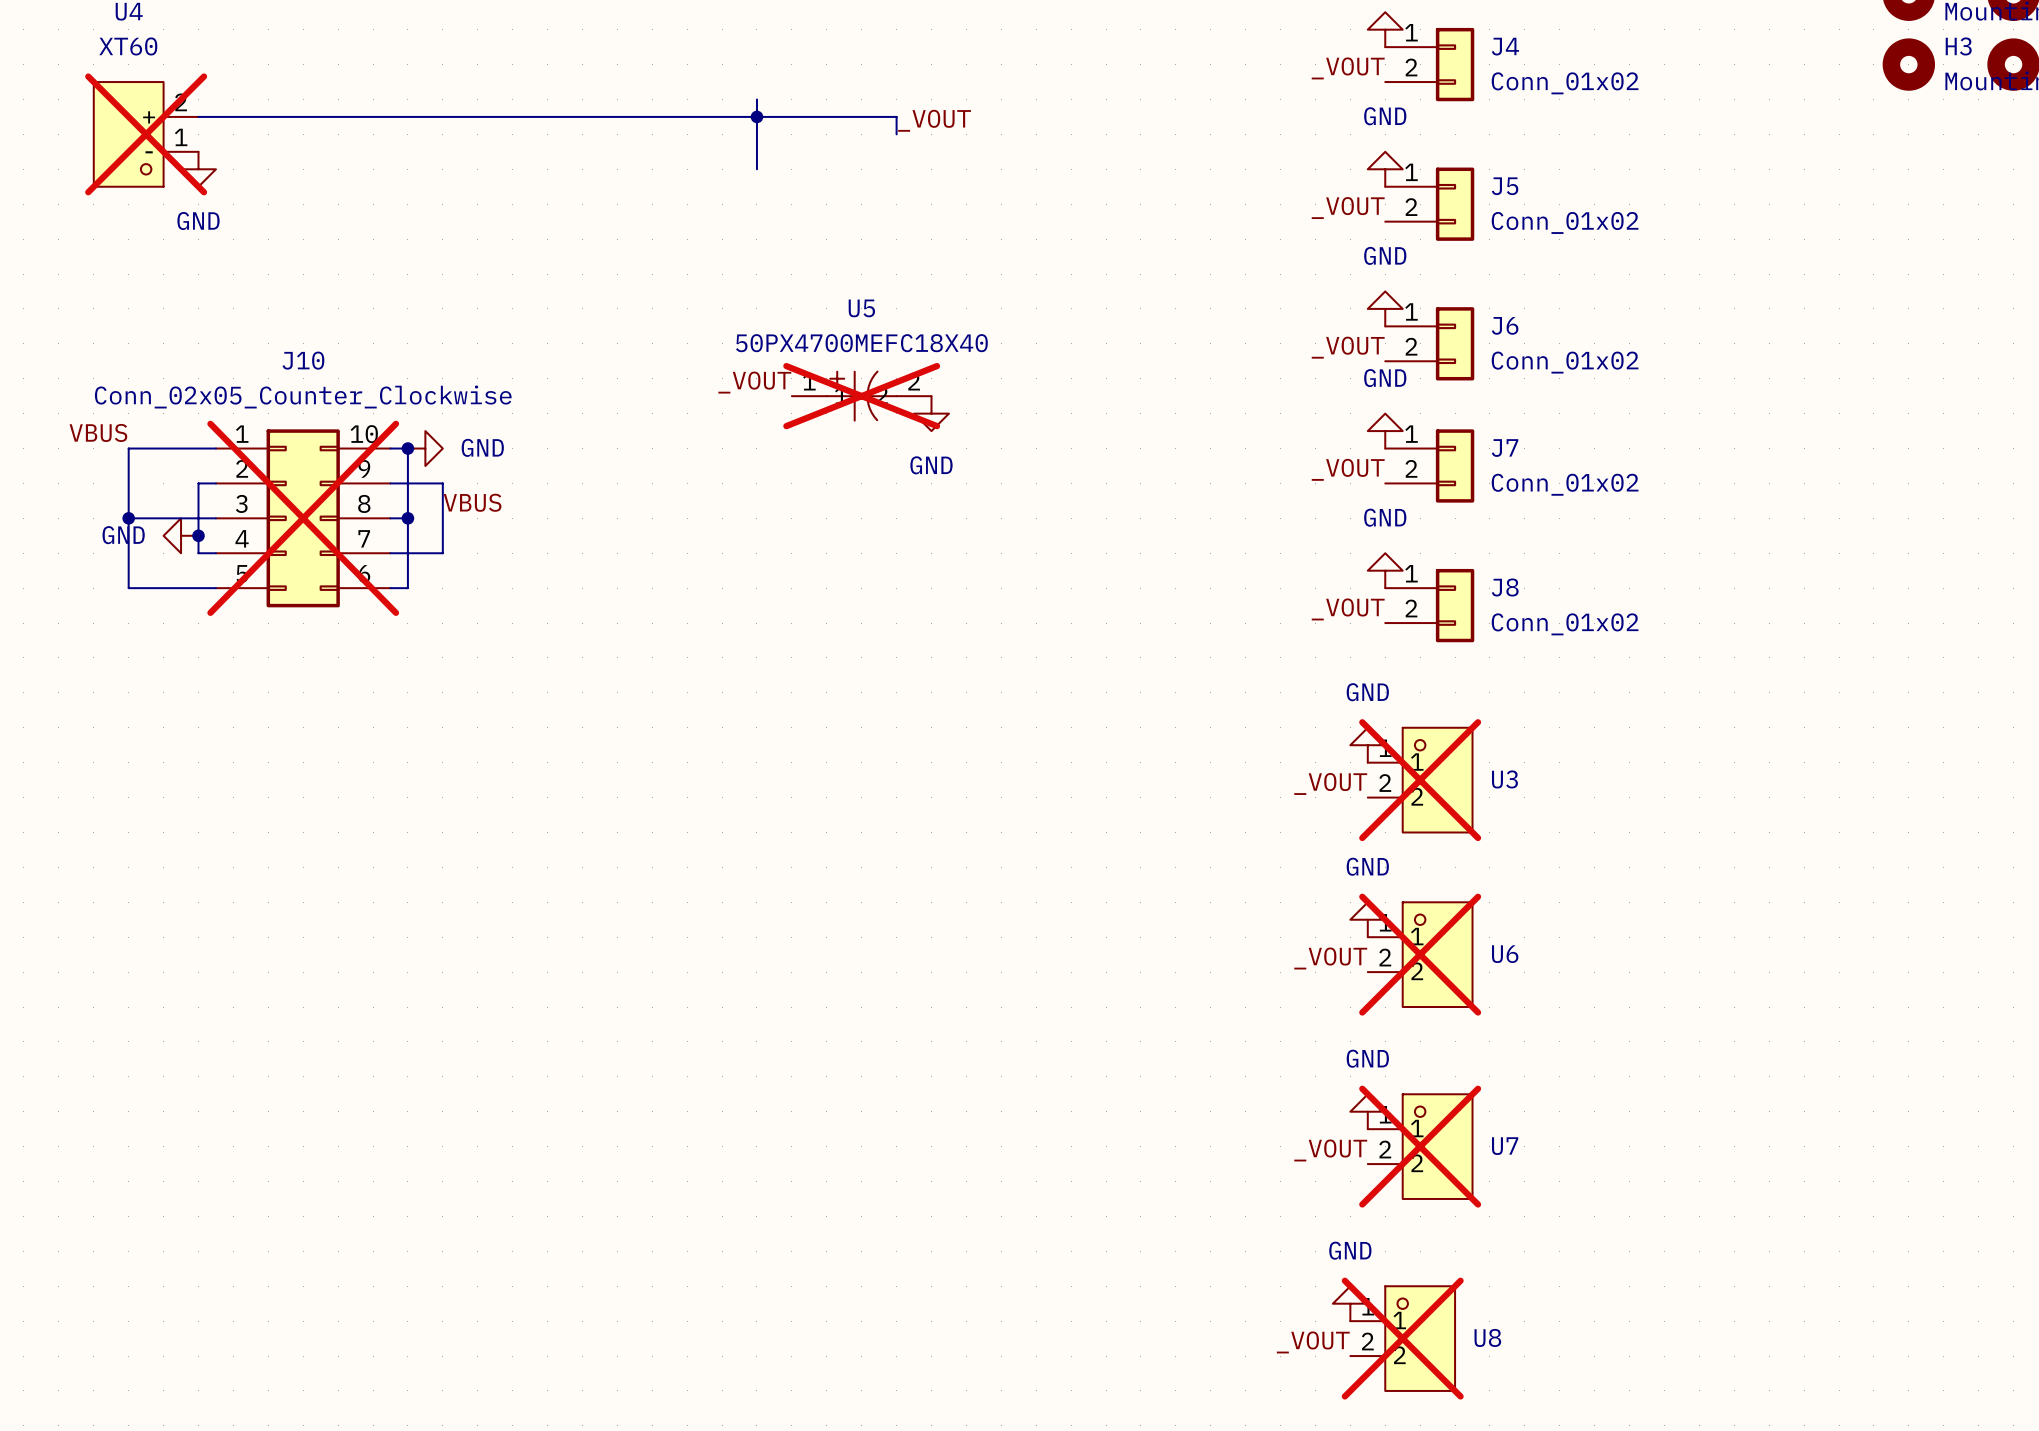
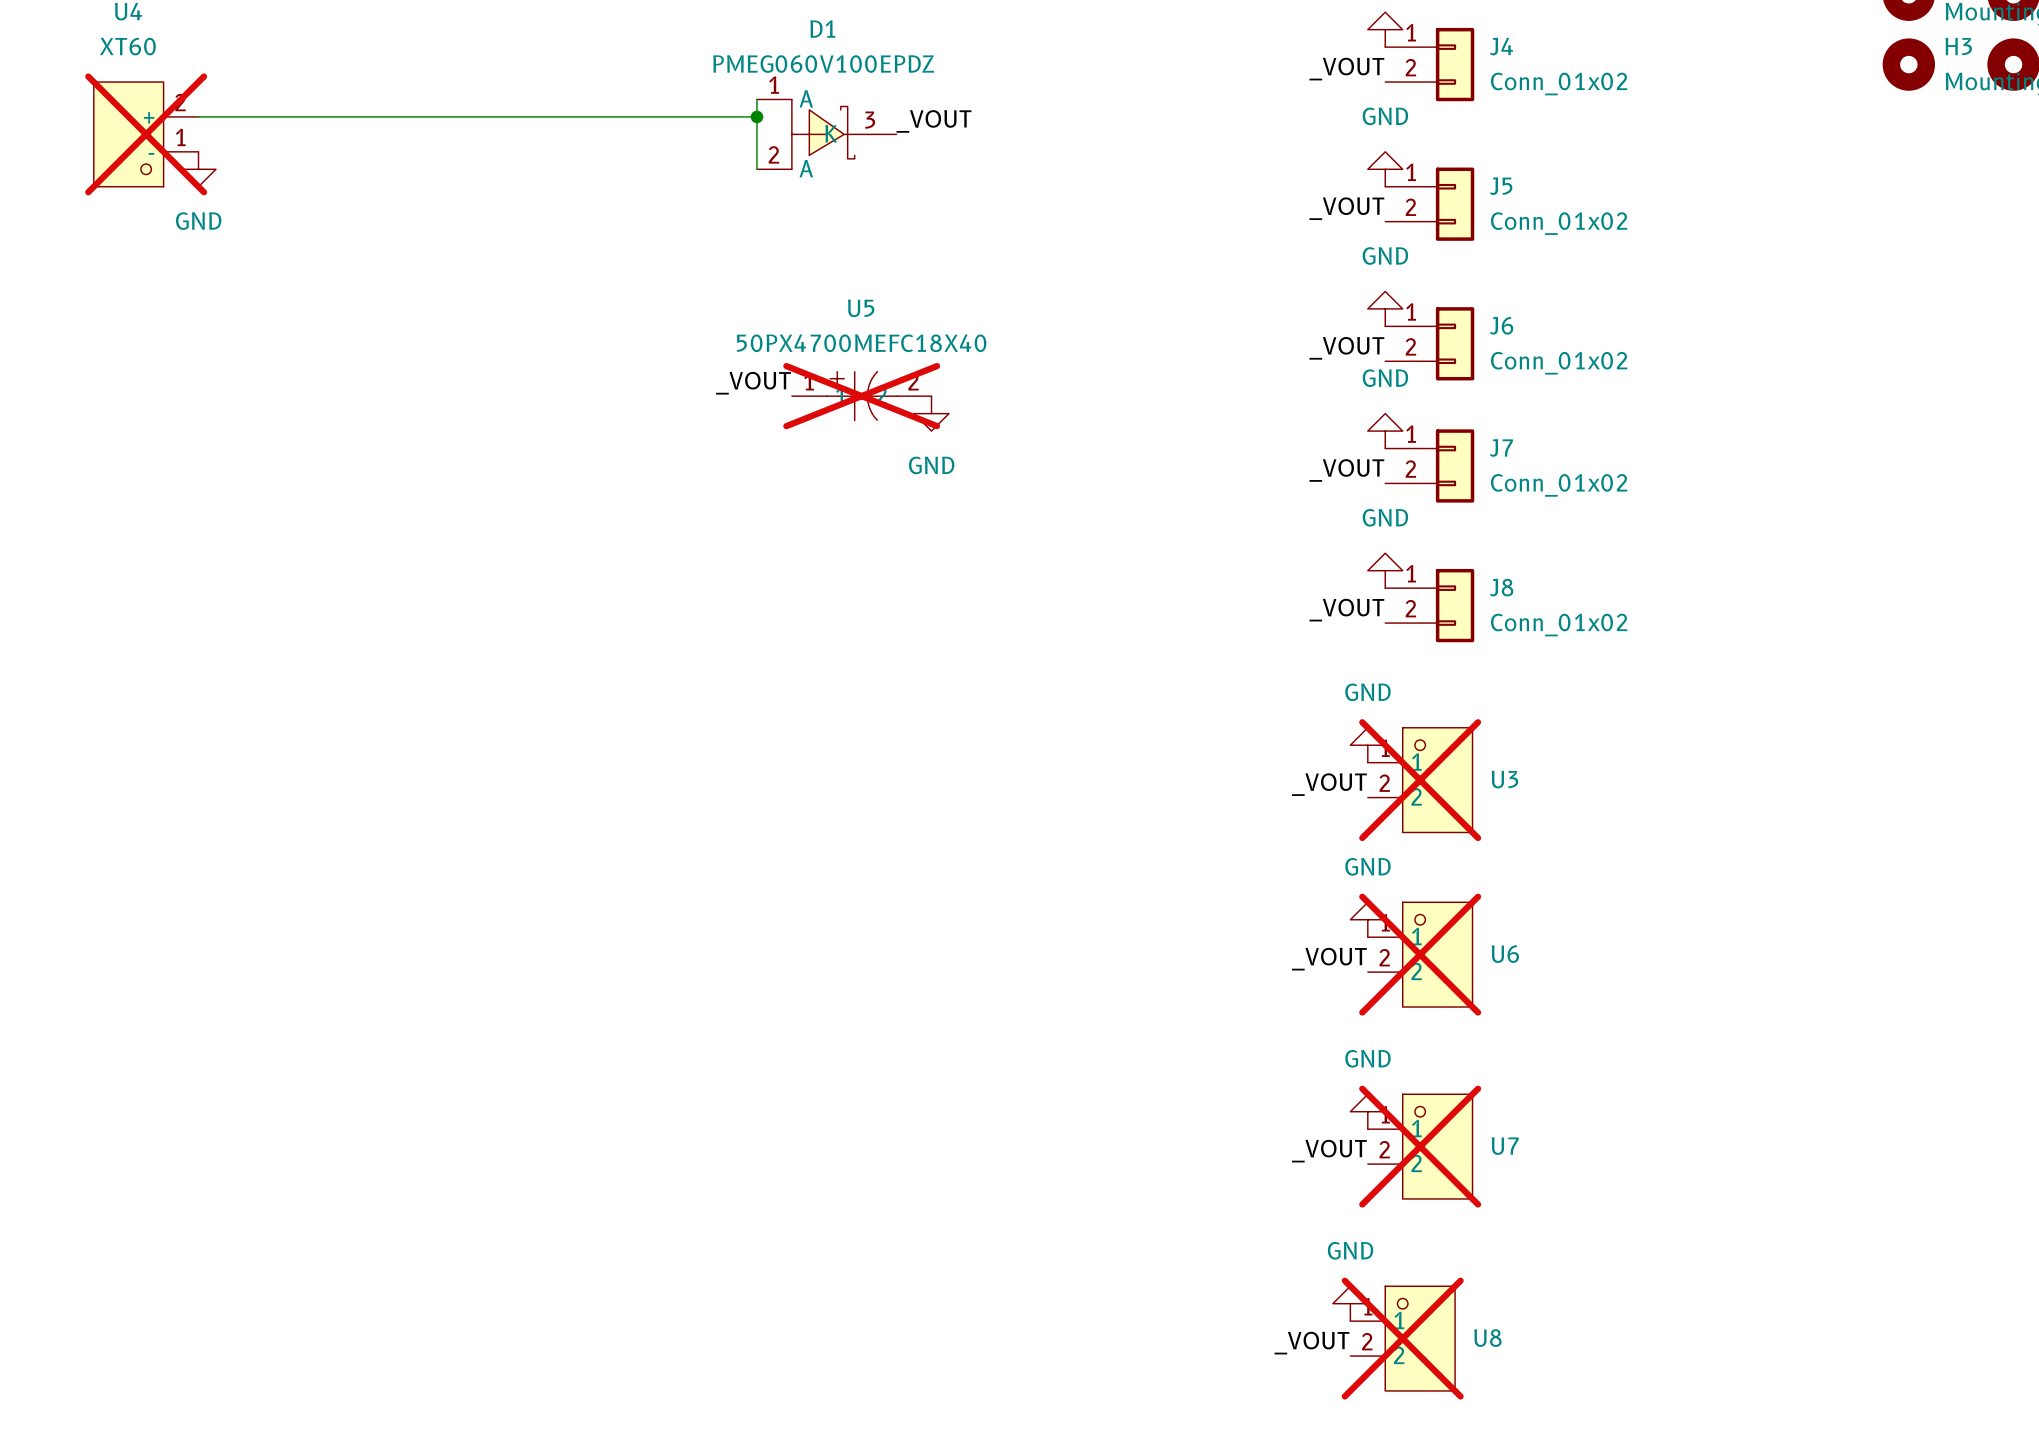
wire: (756, 116) (896, 116) (896, 134) -> none
D1: none -> PMEG060V100EPDZ (826, 134)
label: VBUS (98, 432) -> none
wire: (215, 448) (128, 448) (128, 588) (215, 588) -> none
wire: (390, 448) (407, 448) (407, 588) (390, 588) -> none
junction: (407, 448) -> none
power symbol: GND (425, 448) -> none
wire: (215, 483) (198, 483) (198, 553) (215, 553) -> none
wire: (390, 483) (442, 483) (442, 553) (390, 553) -> none
label: VBUS (472, 502) -> none
wire: (128, 518) (215, 518) -> none
junction: (128, 518) -> none
J10: Conn_02x05_Counter_Clockwise (303, 518) -> none
wire: (390, 518) (407, 518) -> none
junction: (407, 518) -> none
power symbol: GND (181, 535) -> none
junction: (198, 535) -> none

